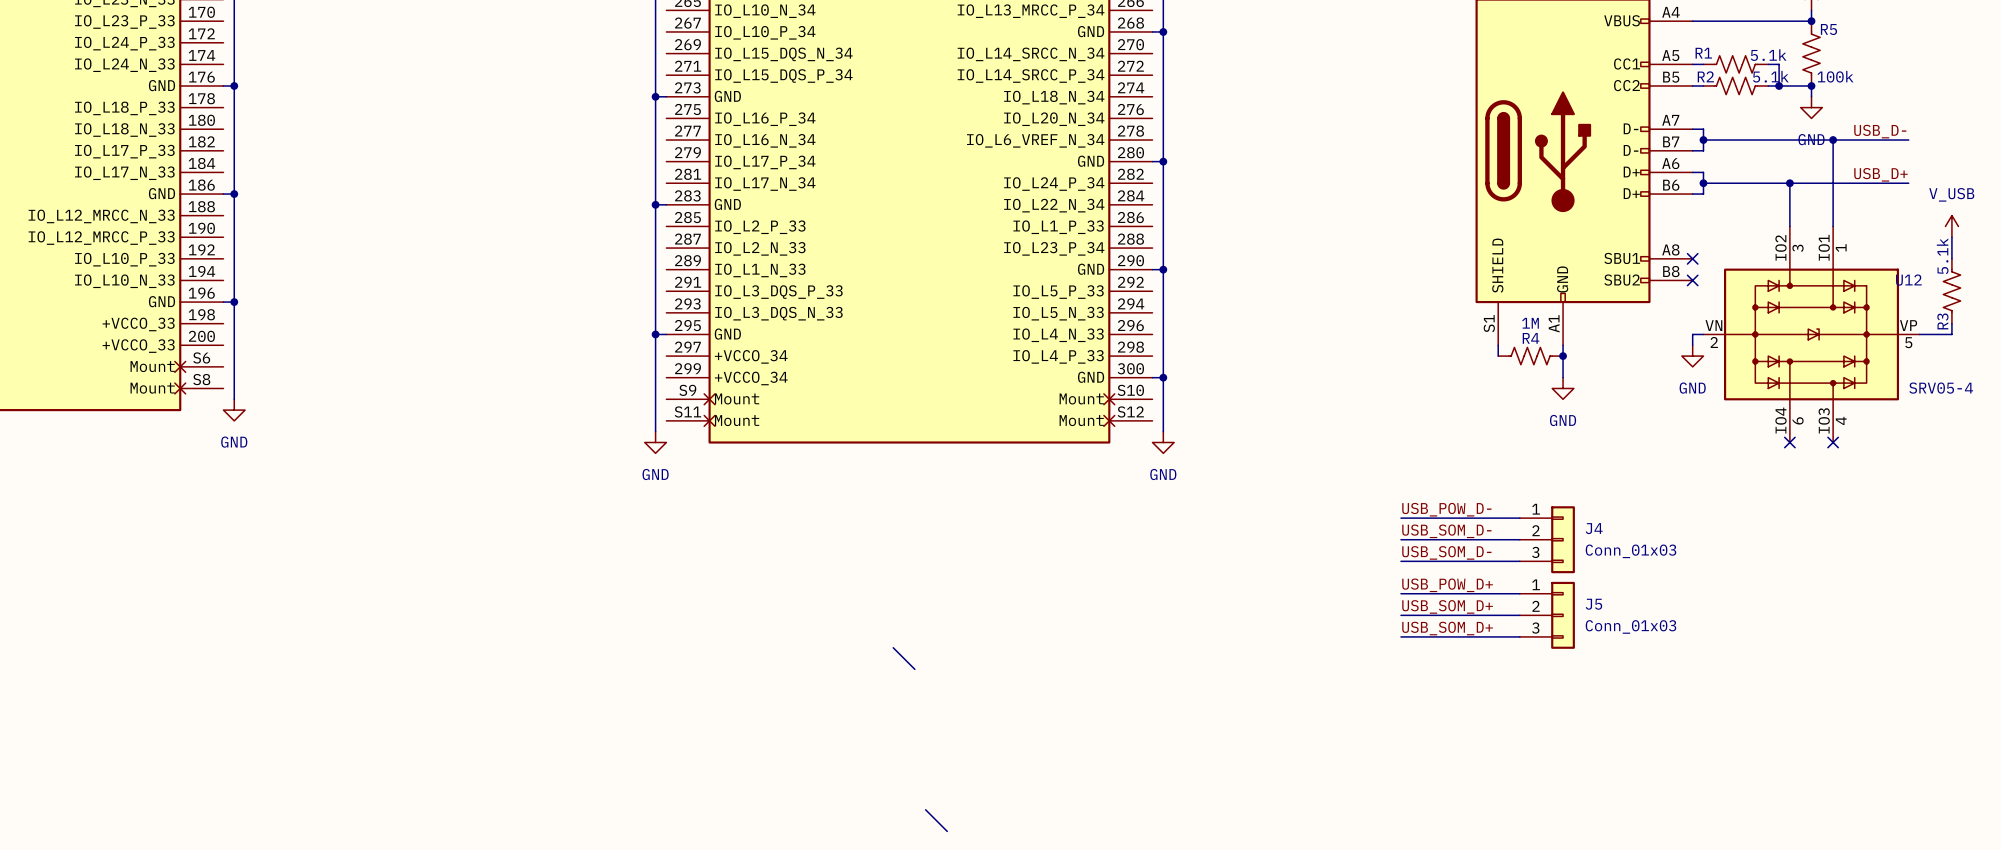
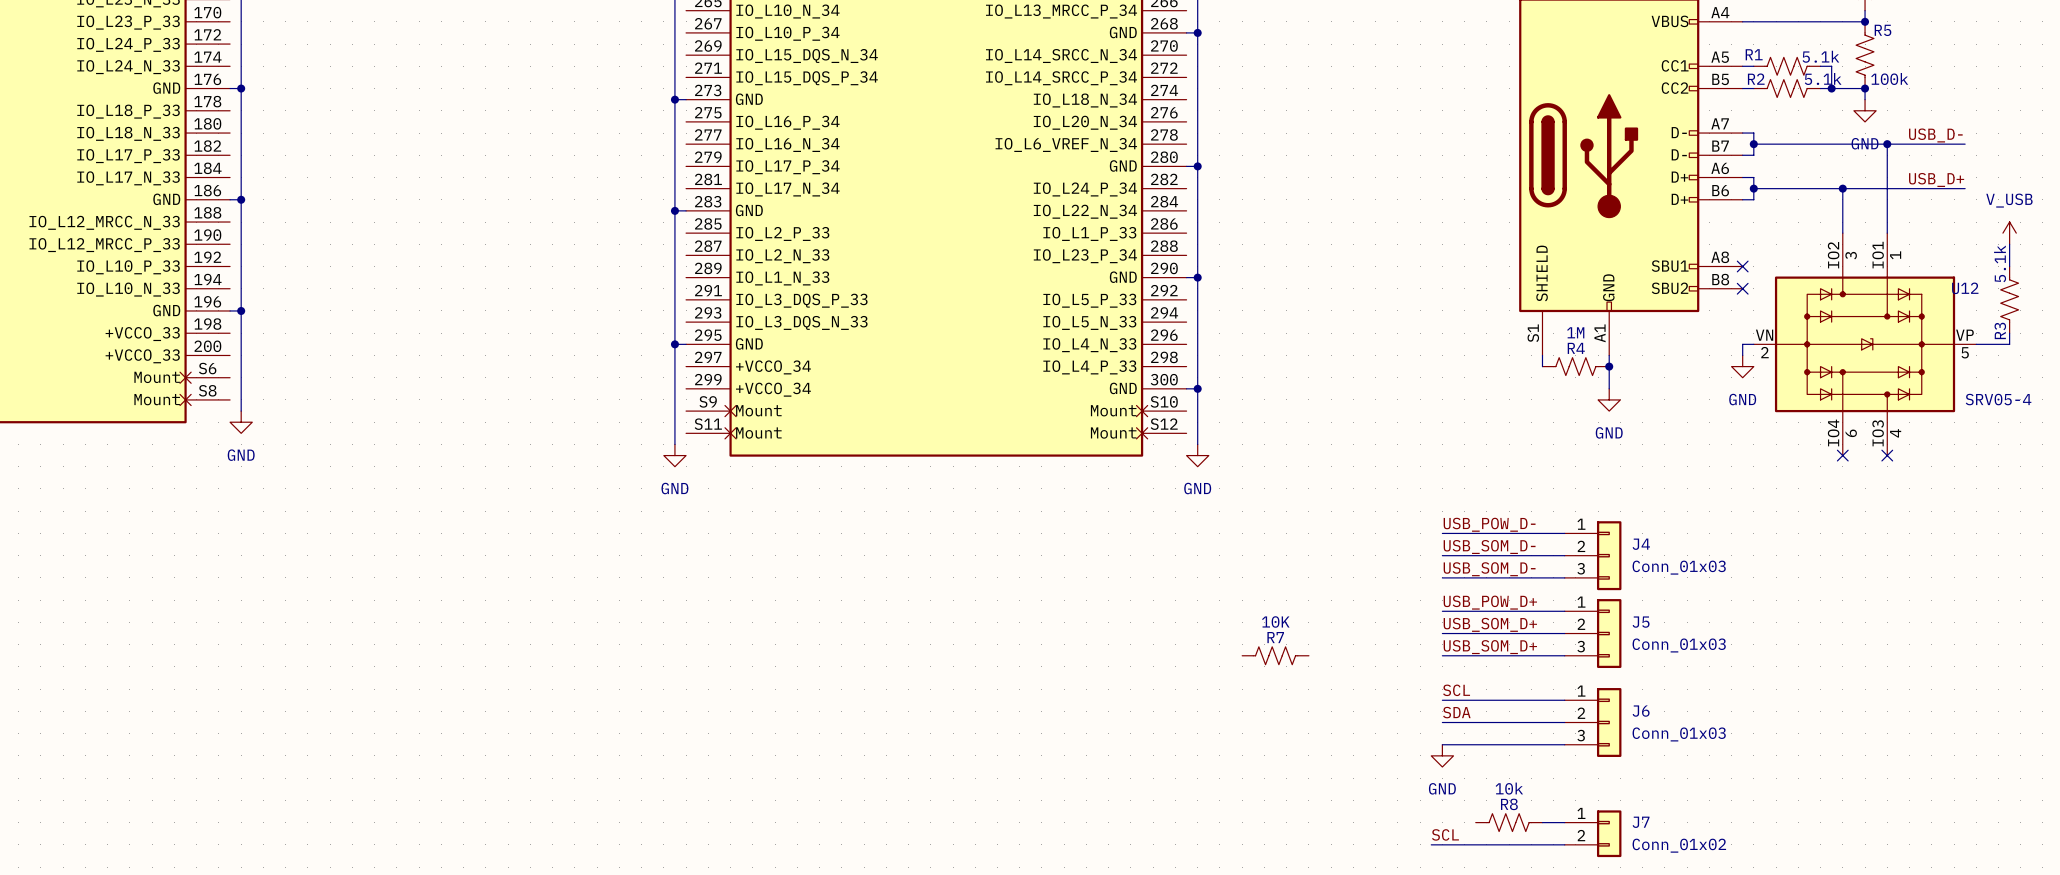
R7: none -> 10K (1275, 655)
wire: (893, 647) (914, 669) -> none
label: none -> SCL (1456, 690)
wire: none -> (1442, 700) (1564, 700)
label: none -> SDA (1456, 712)
wire: none -> (1442, 722) (1564, 722)
J6: none -> Conn_01x03 (1593, 722)
wire: none -> (1442, 744) (1564, 744)
power symbol: none -> GND (1442, 755)
R8: none -> 10k (1509, 822)
wire: none -> (1542, 822) (1564, 822)
wire: (925, 809) (947, 831) -> none
J7: none -> Conn_01x02 (1593, 833)
label: none -> SCL (1445, 834)
wire: none -> (1431, 844) (1564, 844)

